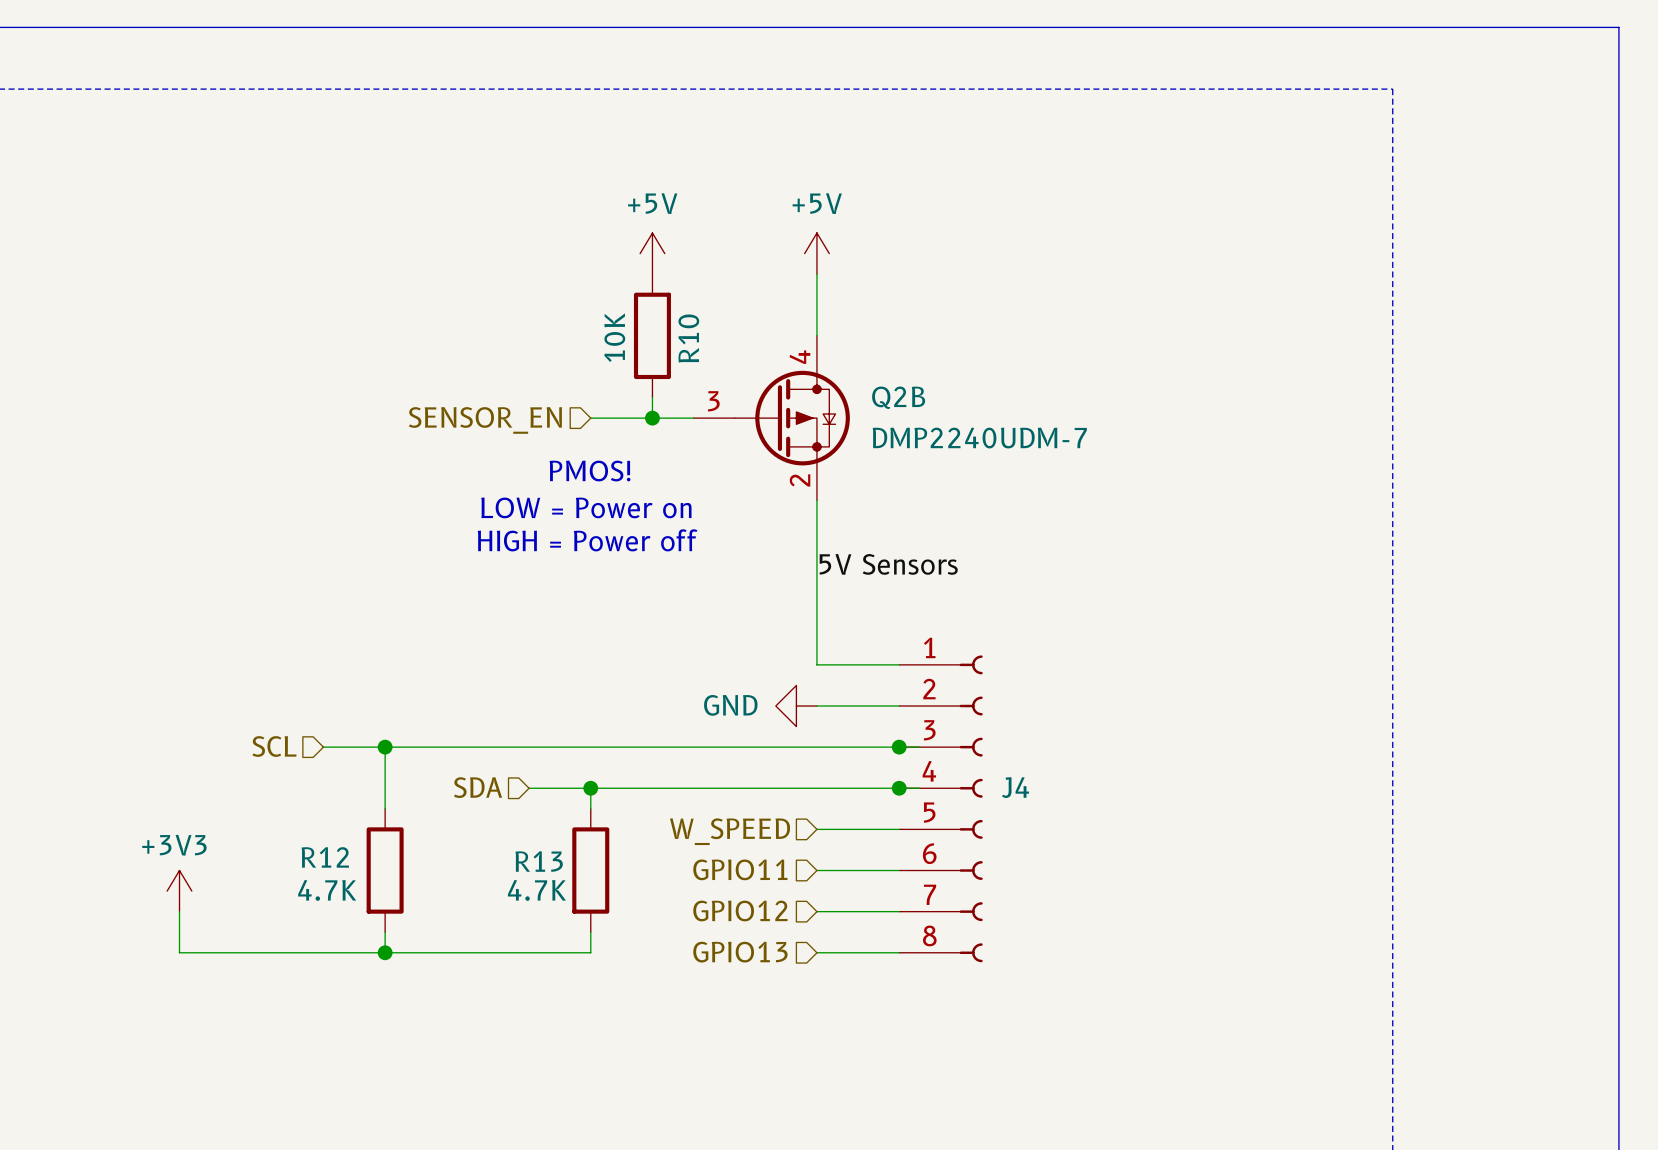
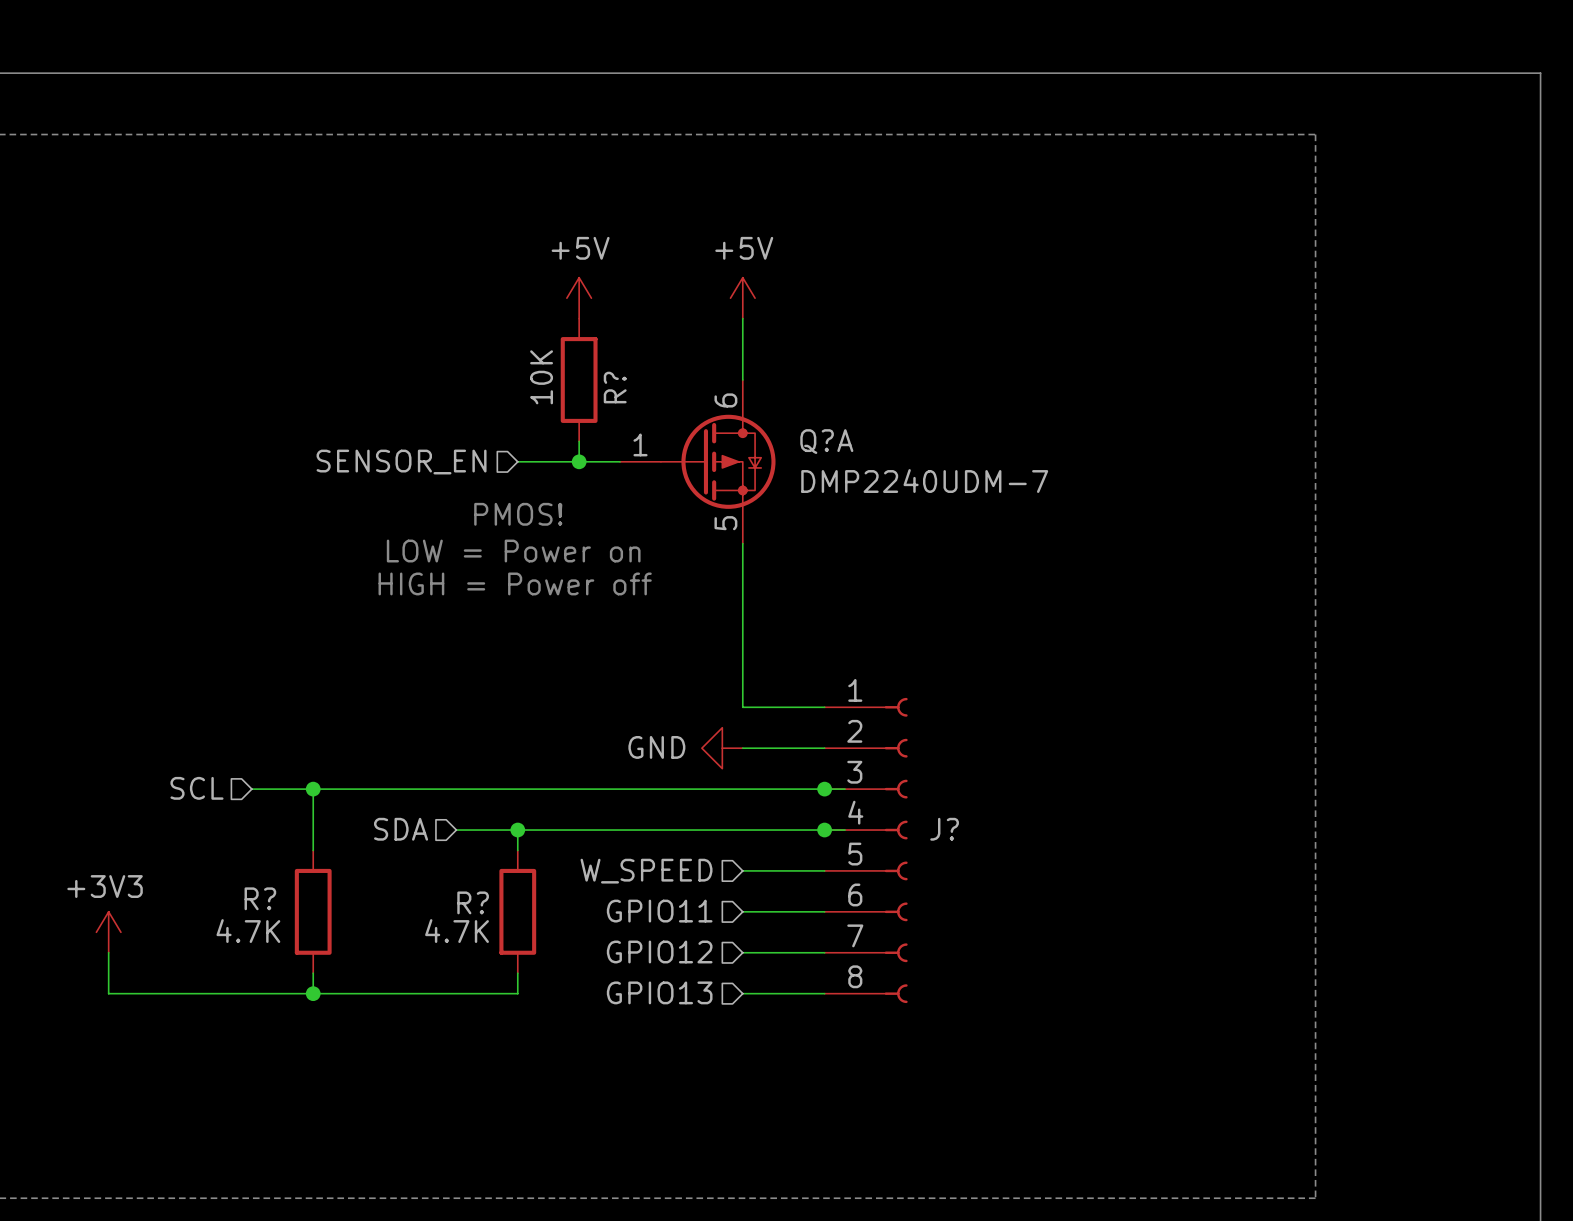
R10 name: R10 (688, 338) -> R? (615, 387)
Q2B pin number: 4 (800, 357) -> 6 (725, 400)
Q2B name: Q2B (898, 397) -> Q?A (826, 441)
Q2B pin number: 3 (713, 401) -> 1 (640, 444)
Q2B pin number: 2 (800, 480) -> 5 (725, 523)
label: 5V Sensors (888, 564) -> none
J4 name: J4 (1015, 787) -> J? (944, 829)
R12 name: R12 (325, 857) -> R? (260, 898)
R13 name: R13 (539, 861) -> R? (473, 902)

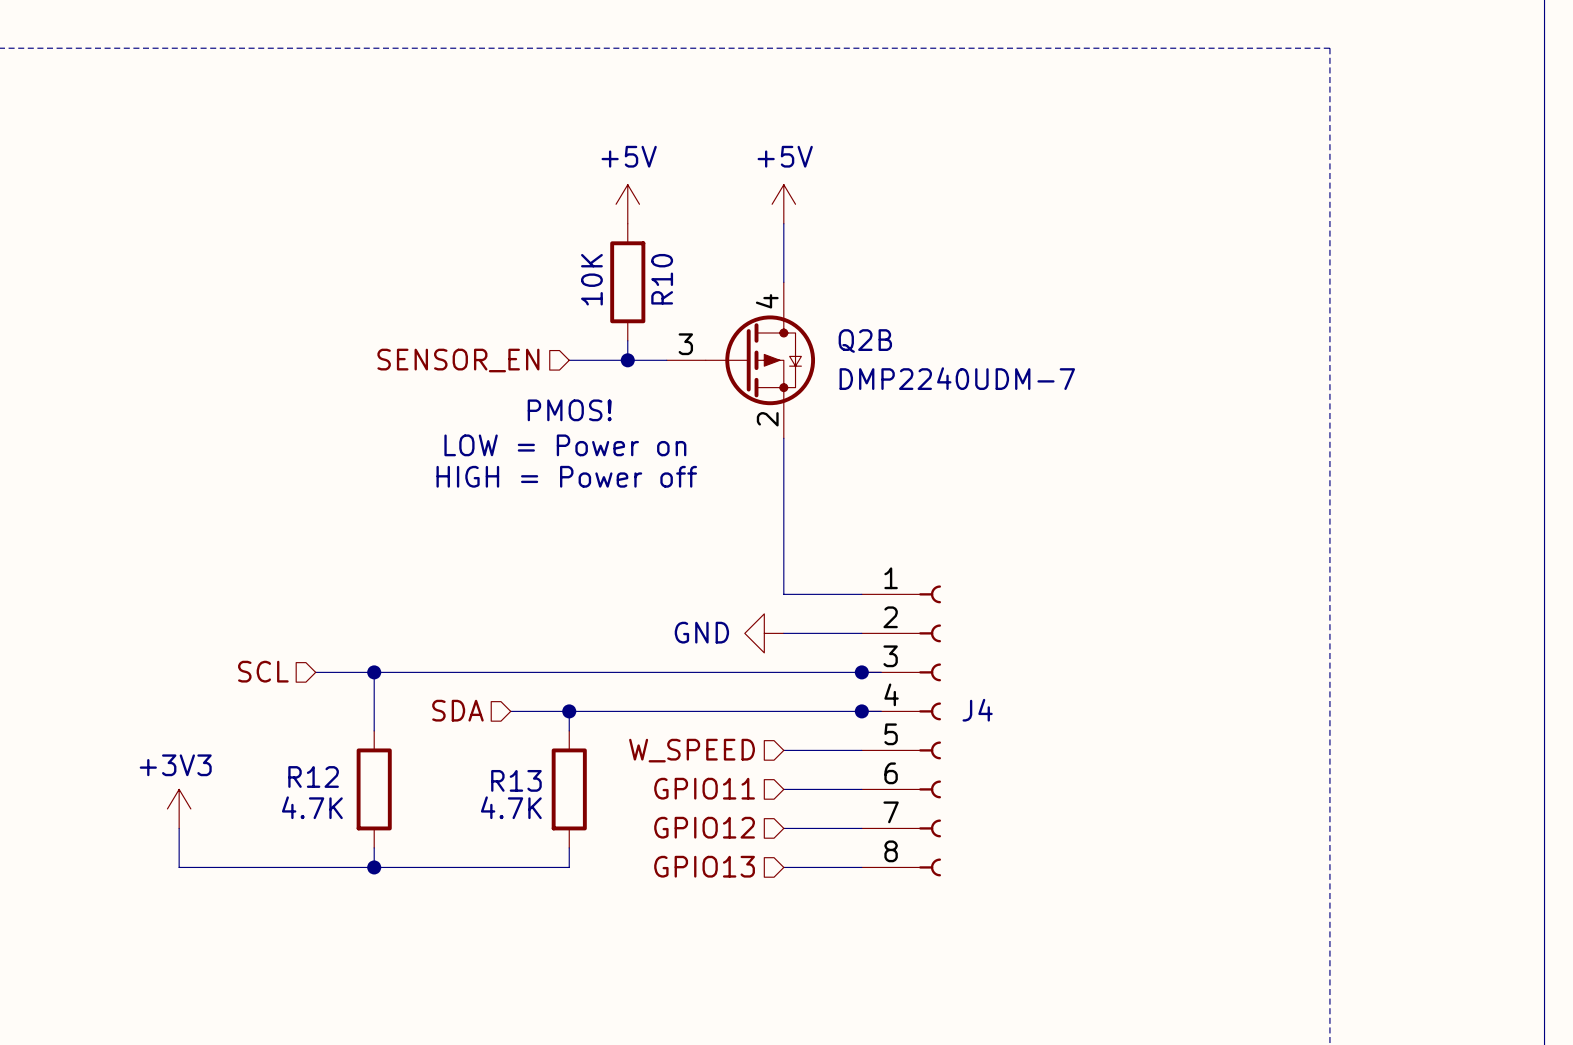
R? name: R? (615, 387) -> R10 (662, 279)
Q?A pin number: 6 (725, 400) -> 4 (767, 301)
Q?A name: Q?A (826, 441) -> Q2B (865, 341)
Q?A pin number: 1 (640, 444) -> 3 (685, 344)
Q?A pin number: 5 (725, 523) -> 2 (767, 419)
J? name: J? (944, 829) -> J4 (977, 710)
R? name: R? (260, 898) -> R12 (313, 776)
R? name: R? (473, 902) -> R13 (516, 780)

